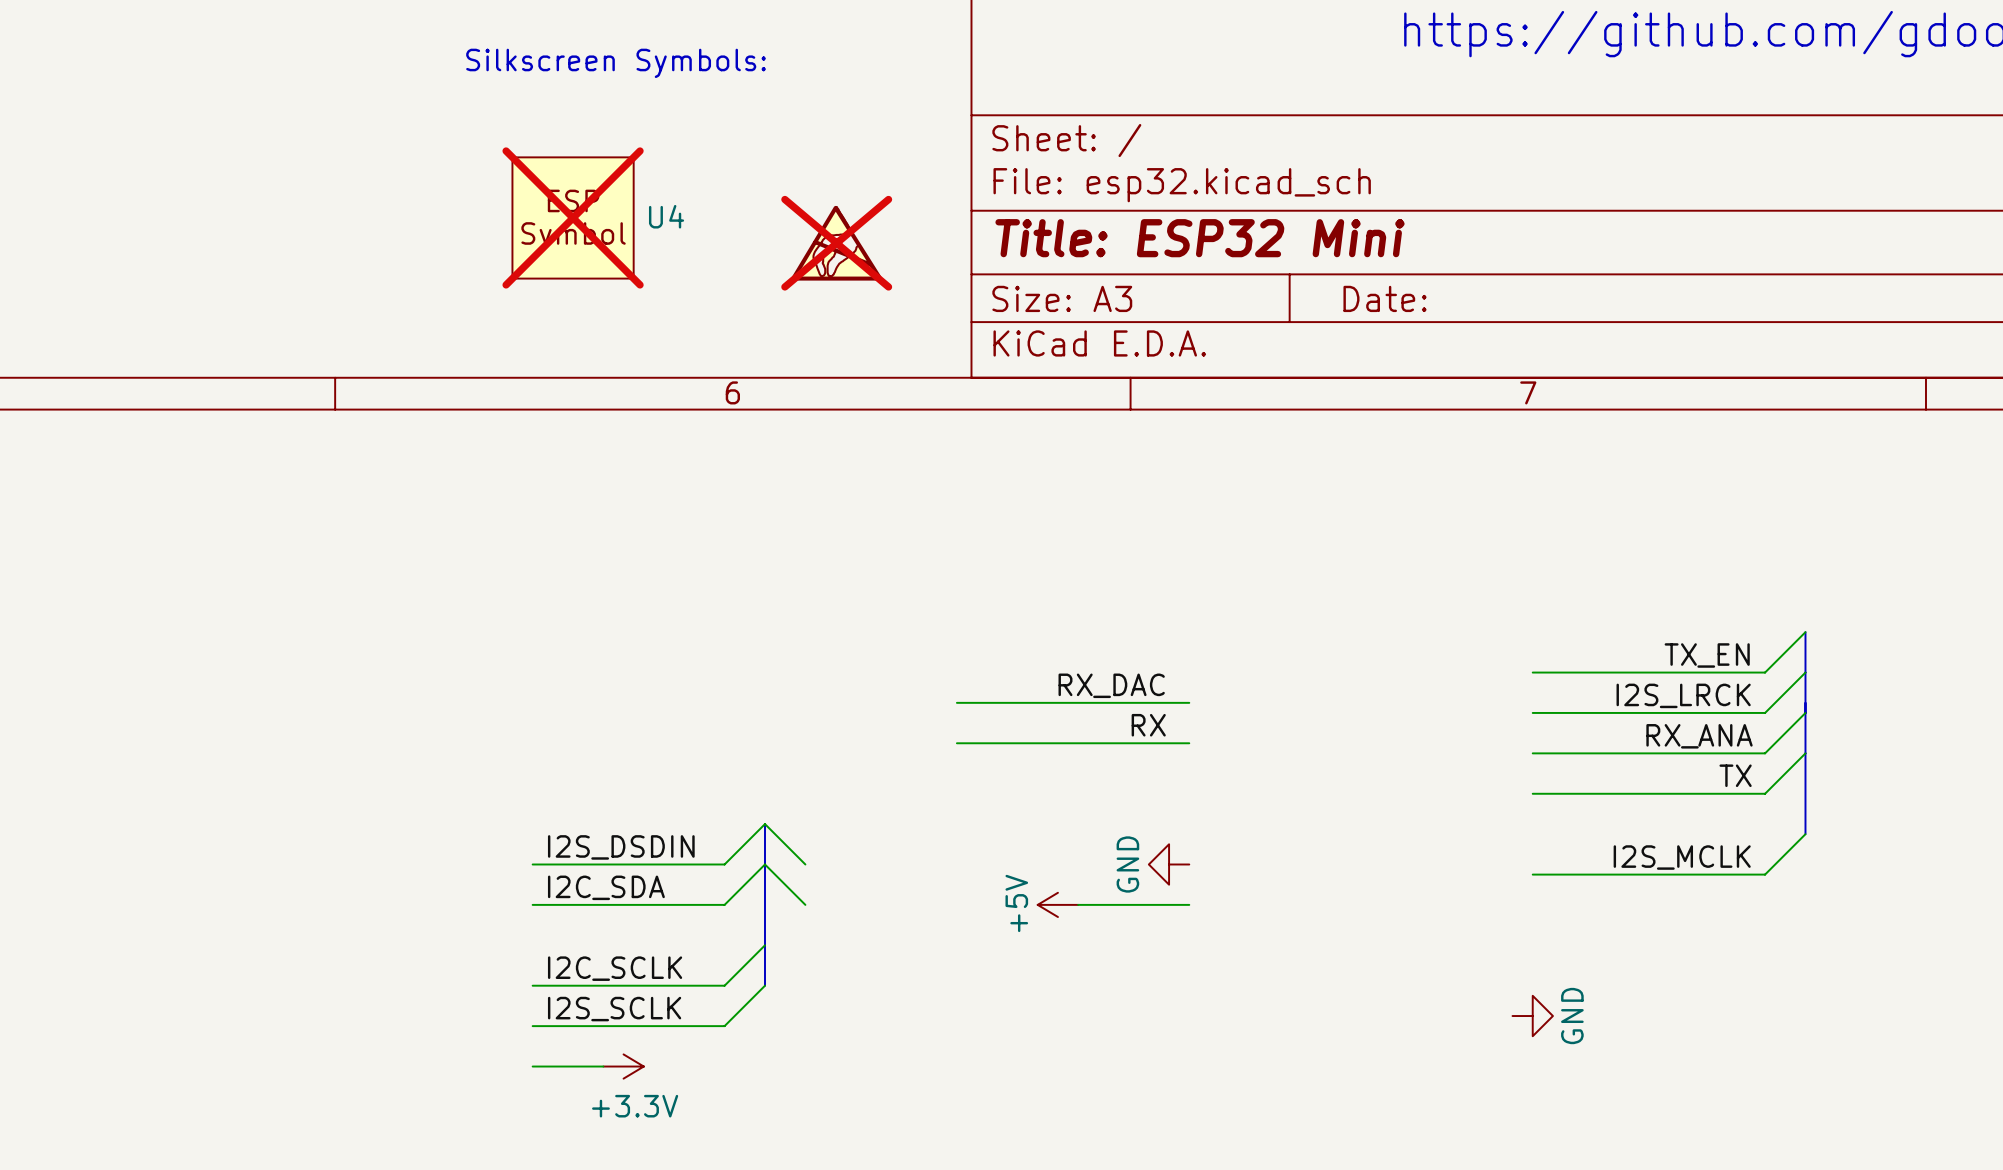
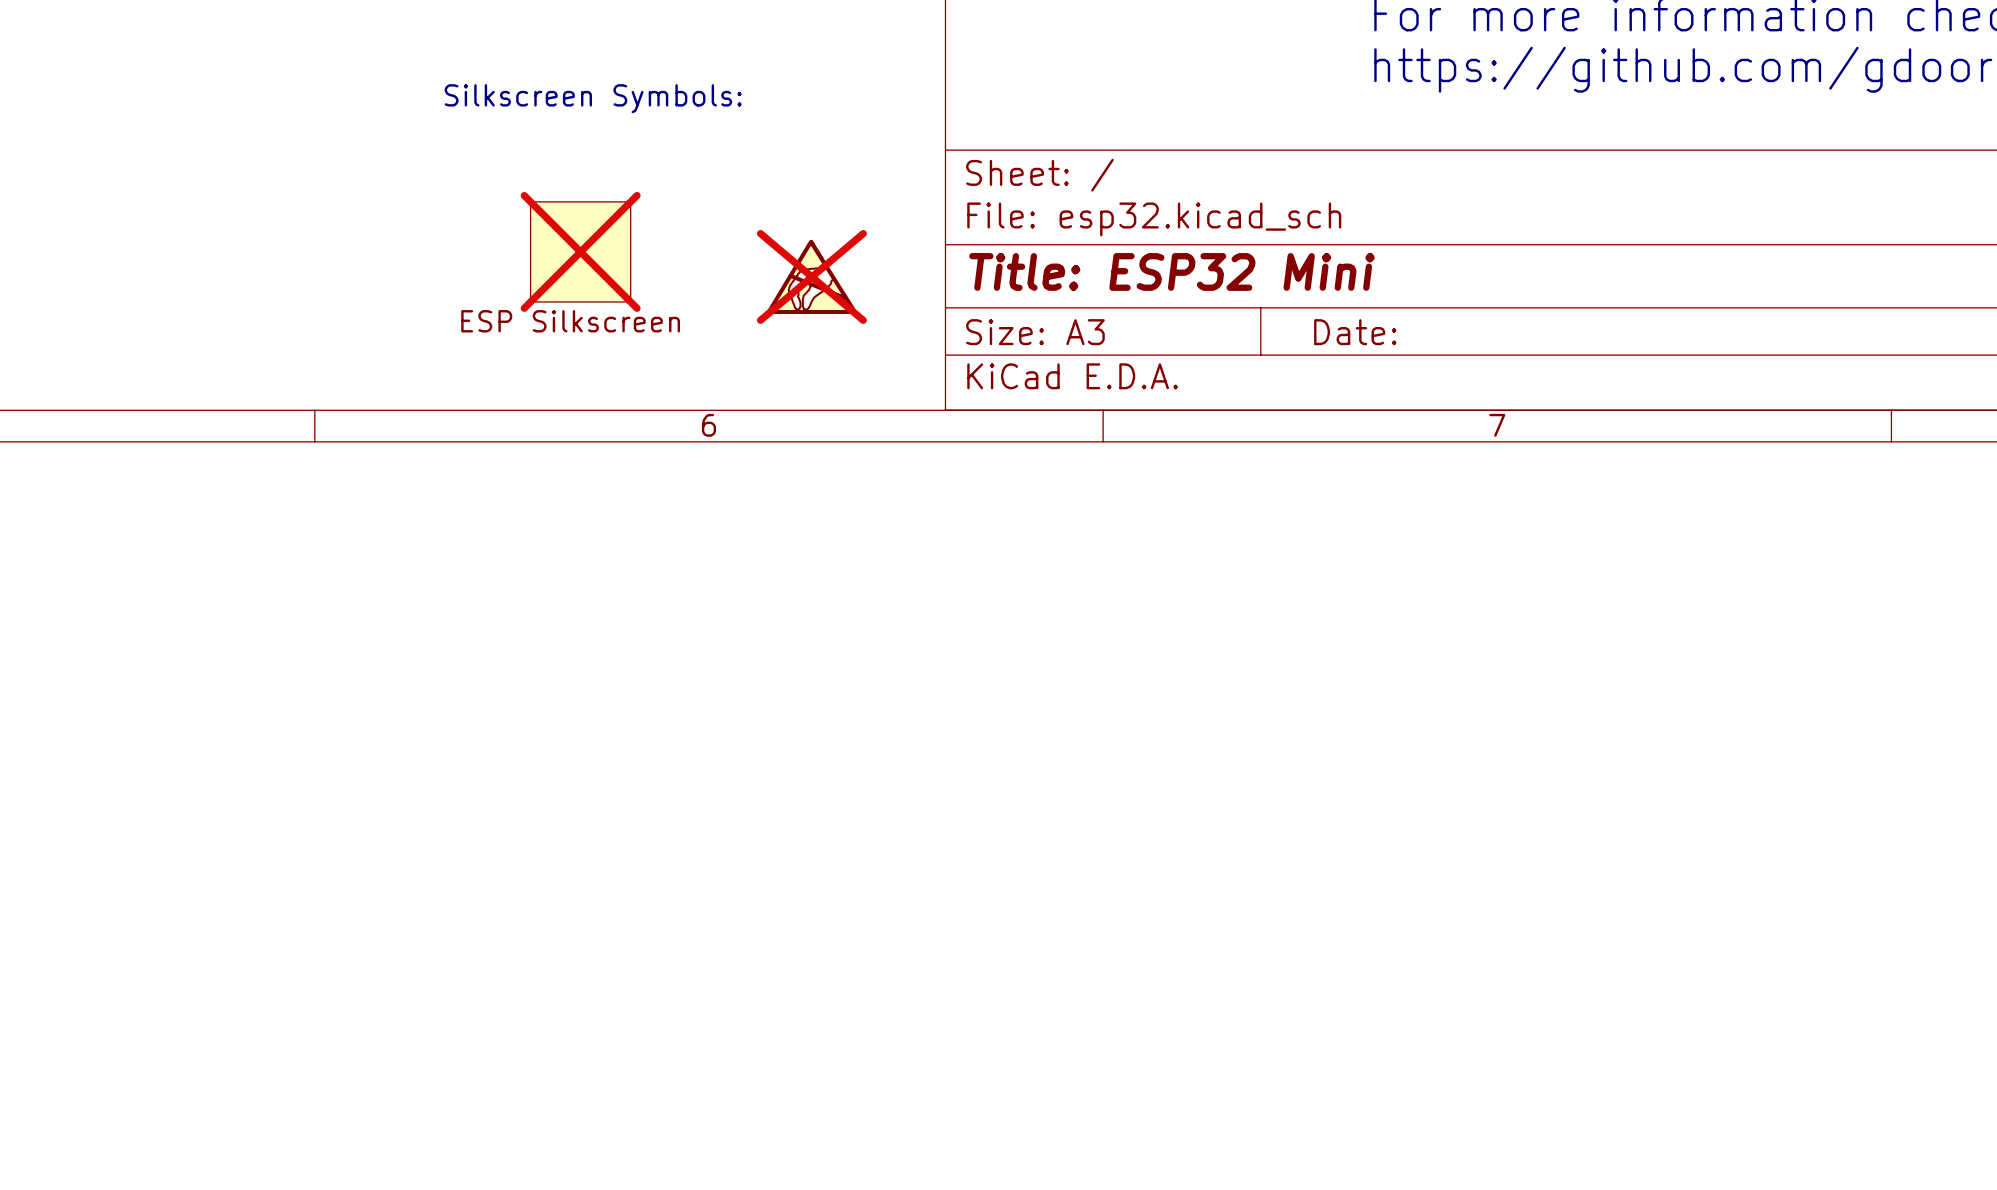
U4: (573, 217) -> none
part: none -> (580, 251)
wire: (1805, 632) (1765, 672) (1532, 672) -> none
bus: (1805, 632) (1805, 834) -> none
label: TX_EN (1707, 655) -> none
wire: (1805, 672) (1765, 712) (1532, 712) -> none
label: RX_DAC (1111, 685) -> none
label: I2S_LRCK (1683, 695) -> none
wire: (956, 702) (1189, 702) -> none
wire: (1805, 712) (1765, 753) (1532, 753) -> none
label: RX (1148, 725) -> none
label: RX_ANA (1699, 736) -> none
wire: (956, 743) (1189, 743) -> none
wire: (1805, 753) (1765, 793) (1532, 793) -> none
label: TX (1735, 775) -> none
bus: (764, 824) (764, 985) -> none
wire: (1805, 834) (1765, 874) (1532, 874) -> none
label: I2S_DSDIN (621, 847) -> none
label: I2S_MCLK (1682, 857) -> none
wire: (532, 864) (724, 864) (764, 824) (805, 864) -> none
wire: (764, 864) (724, 904) (532, 904) -> none
wire: (764, 864) (805, 904) -> none
power symbol: GND (1169, 864) -> none
label: I2C_SDA (606, 887) -> none
power symbol: +5V (1057, 904) -> none
wire: (1078, 904) (1189, 904) -> none
wire: (764, 945) (724, 985) (532, 985) -> none
label: I2C_SCLK (615, 968) -> none
wire: (764, 985) (724, 1026) (532, 1026) -> none
label: I2S_SCLK (614, 1009) -> none
power symbol: GND (1532, 1016) -> none
wire: (532, 1066) (603, 1066) -> none
power symbol: +3.3V (623, 1066) -> none

